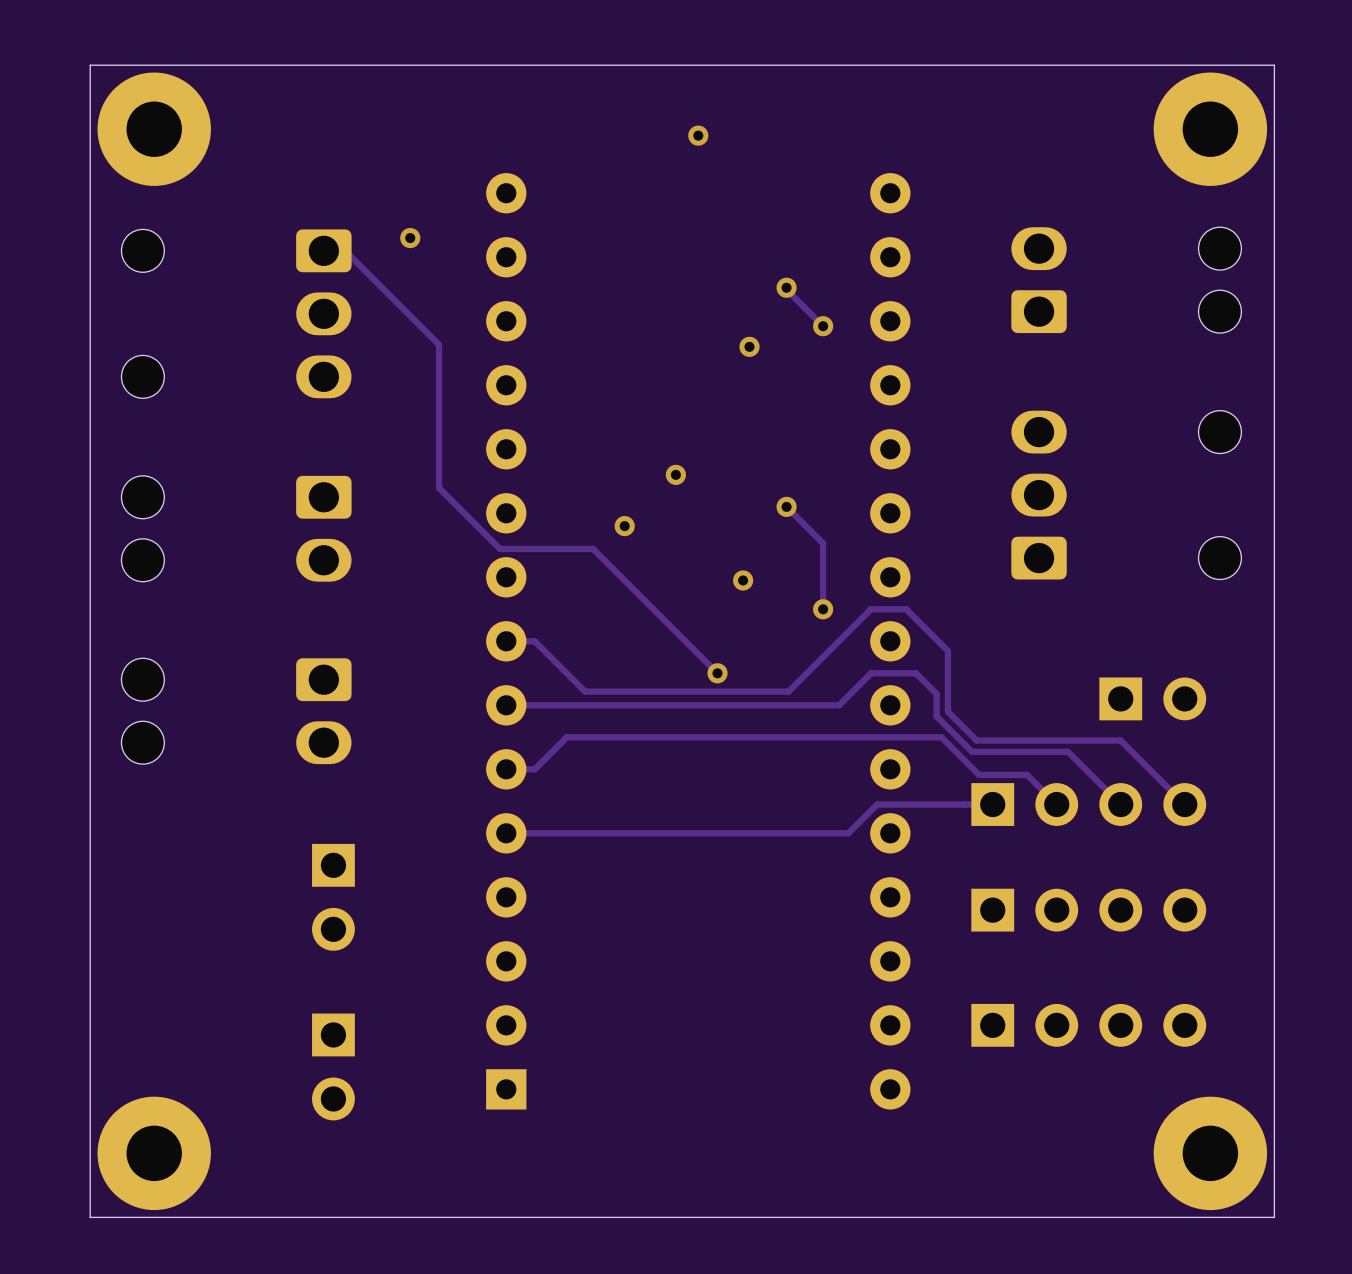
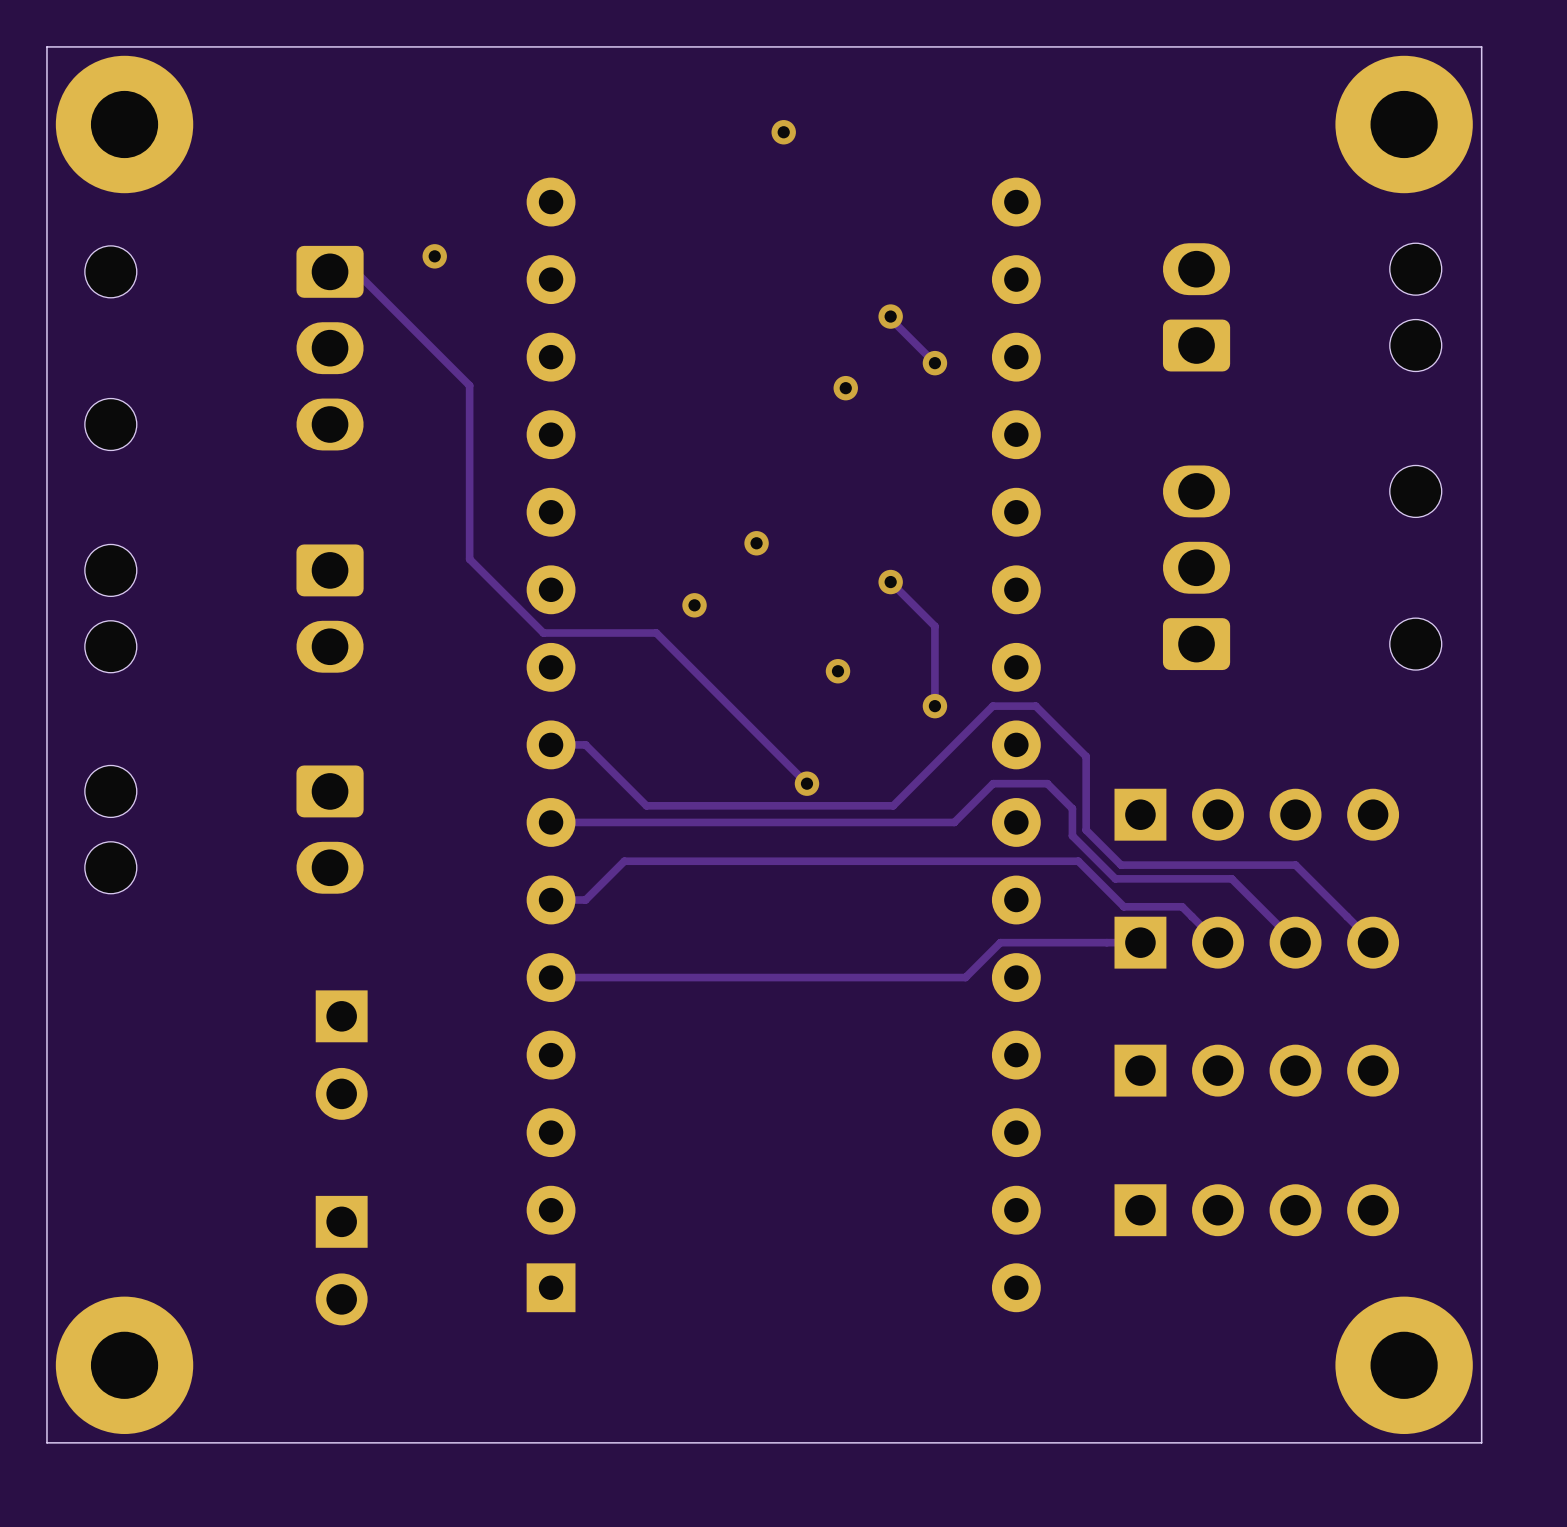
part: none -> (1256, 814)
part: (1152, 698) -> none

